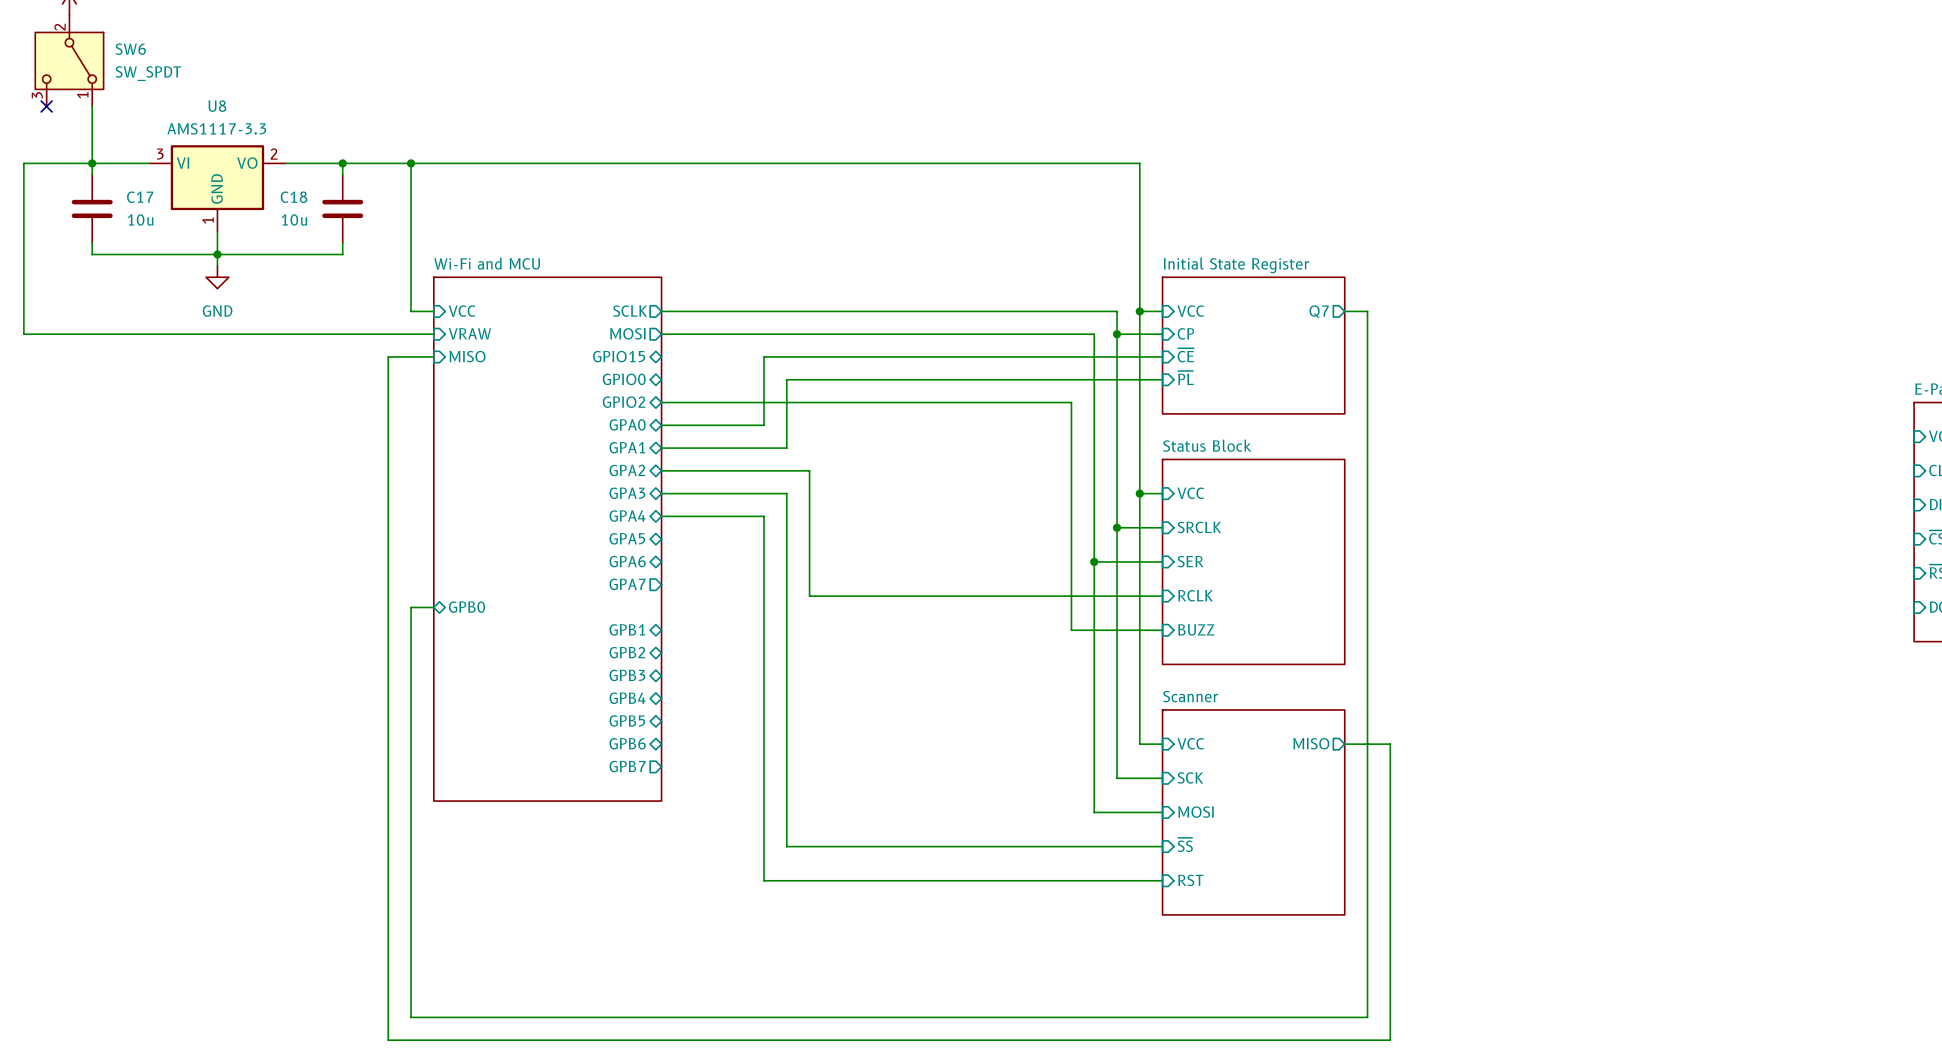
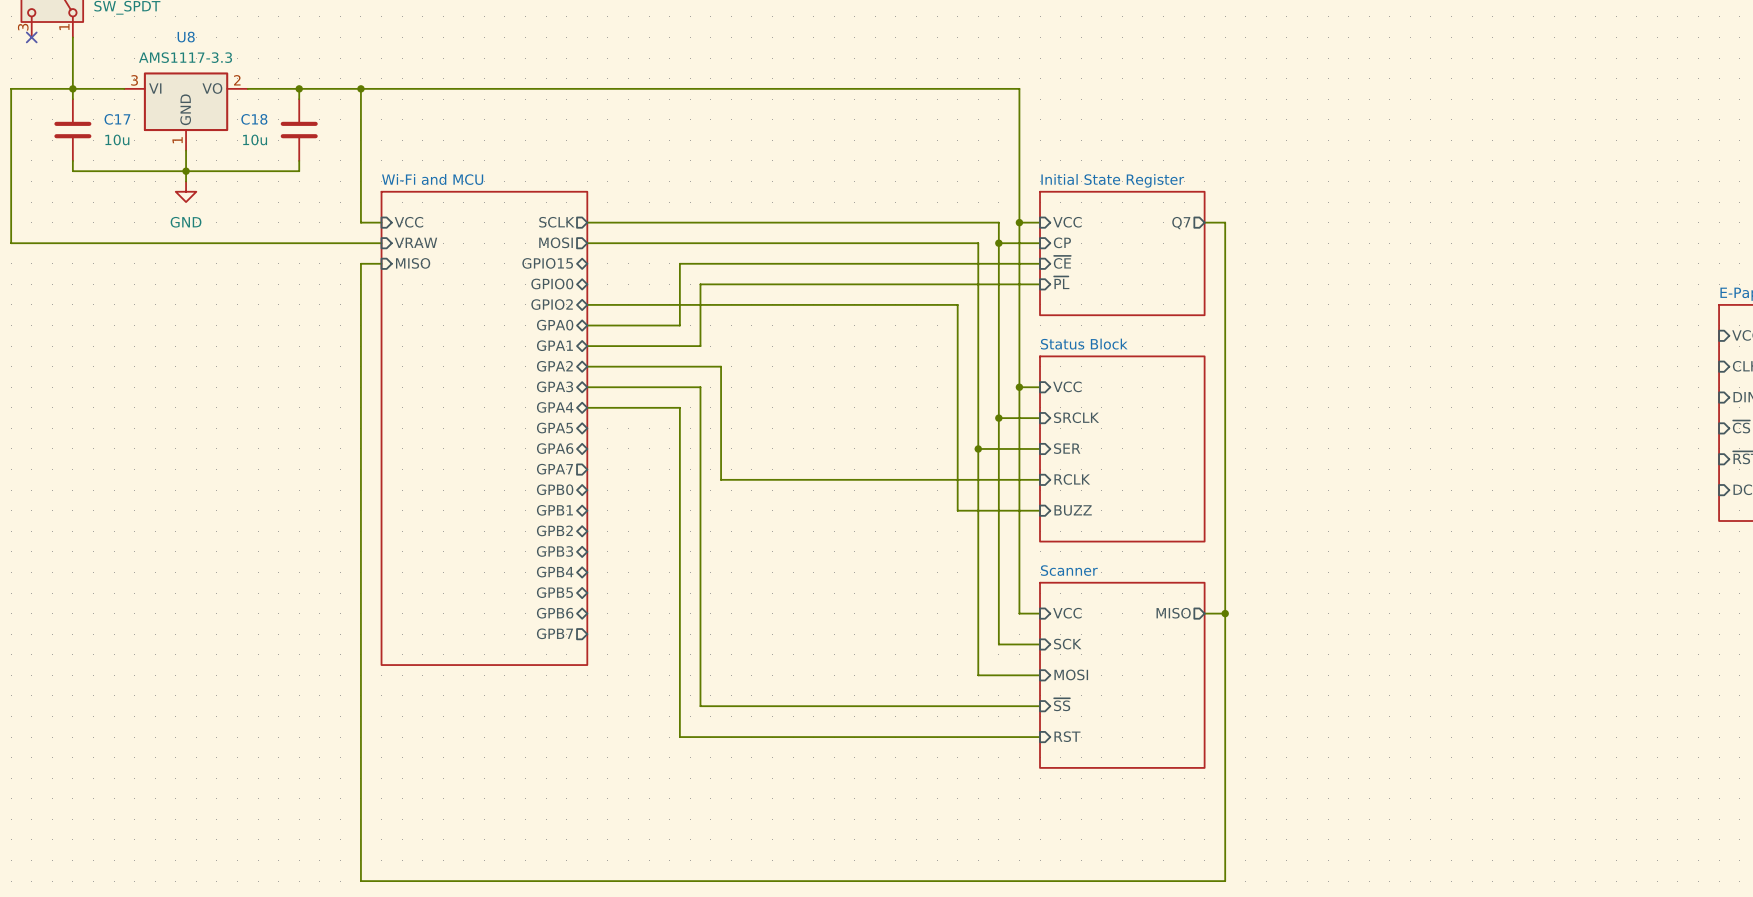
wire: (411, 356) (388, 356) (388, 1040) (411, 1040) -> (360, 860) (360, 881)
wire: (411, 607) (433, 607) -> (360, 490) (360, 263)
sheet pin rotation: 0° (466, 607) -> 180° (555, 489)
sheet pin position: GPB0 (466, 607) -> GPB0 (555, 489)
wire: (1367, 744) (1390, 744) (1390, 1040) (1367, 1040) -> (1225, 860) (1225, 881)
junction: none -> (1225, 613)
wire: (411, 1017) (1367, 1017) -> none

